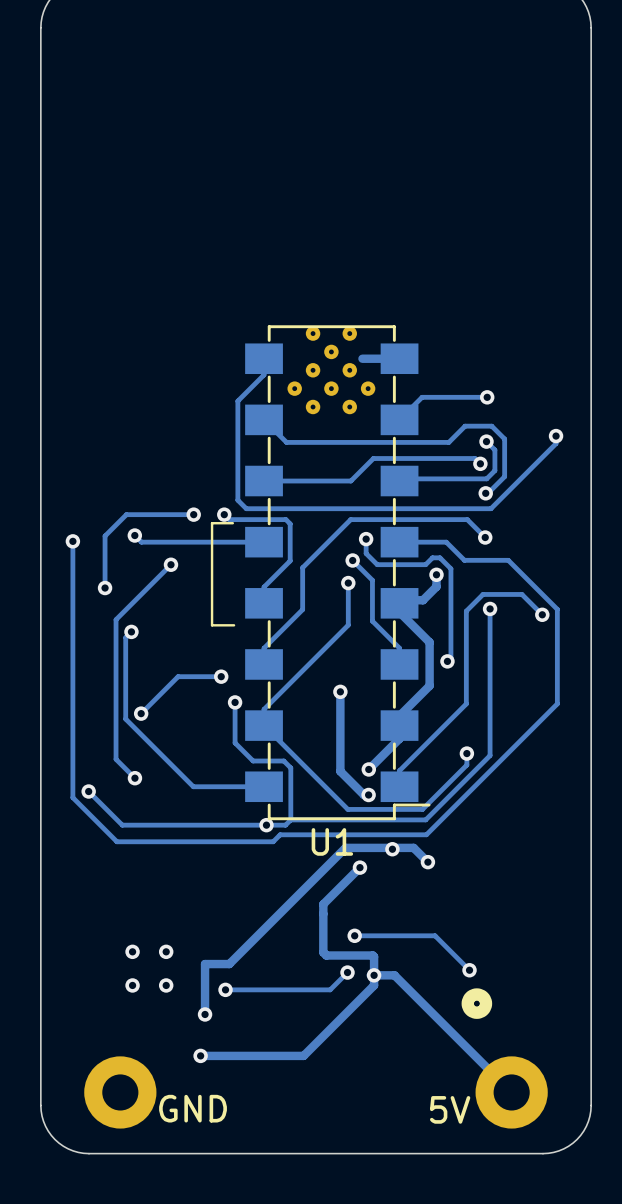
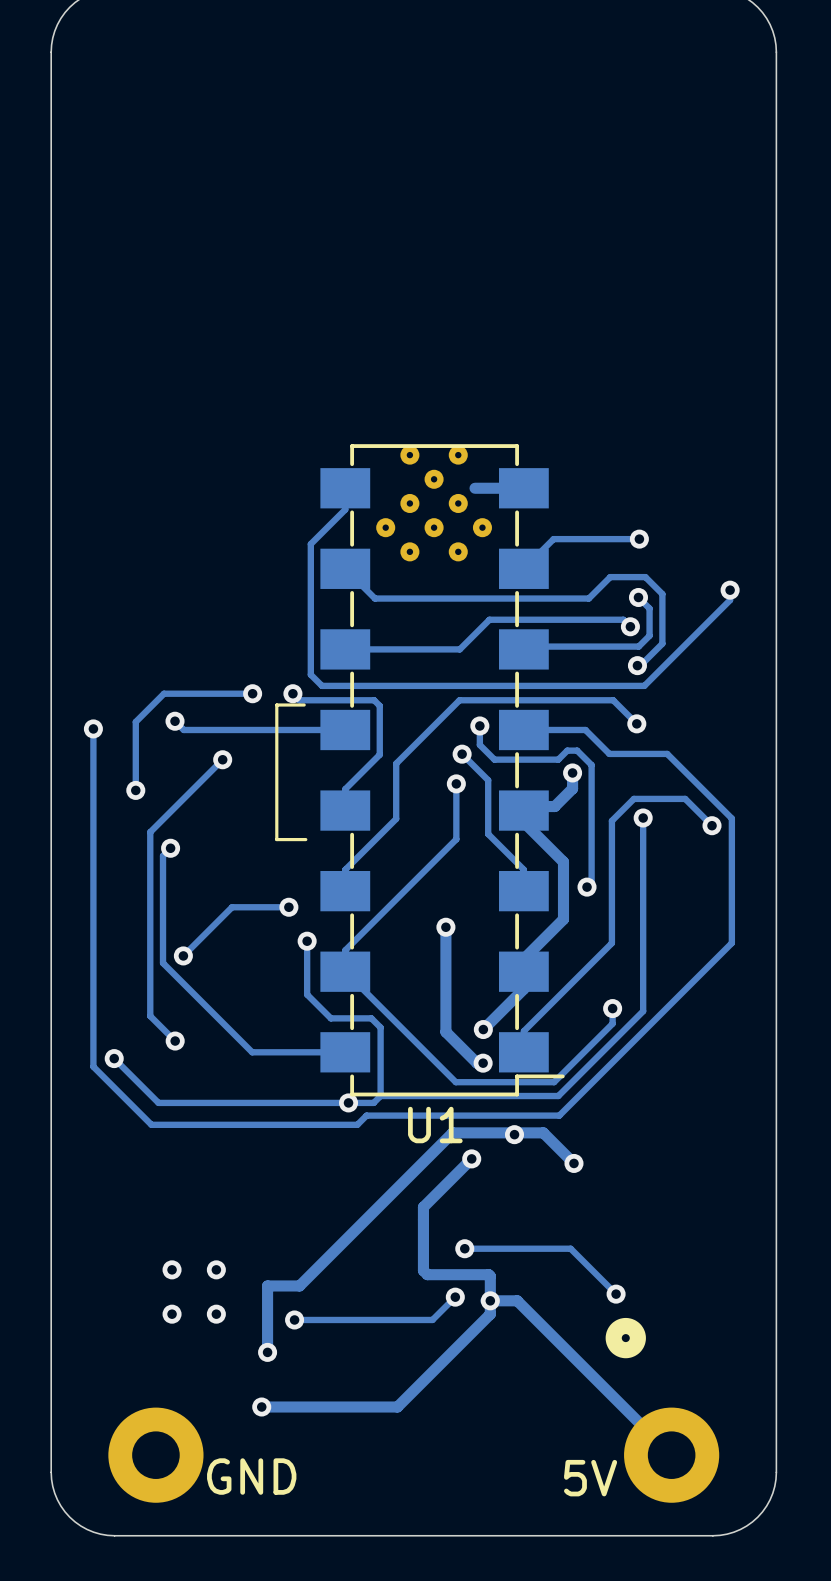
track: (413, 847) (427, 862) -> (542, 1132) (573, 1163)
via position: (427, 862) -> (573, 1163)

